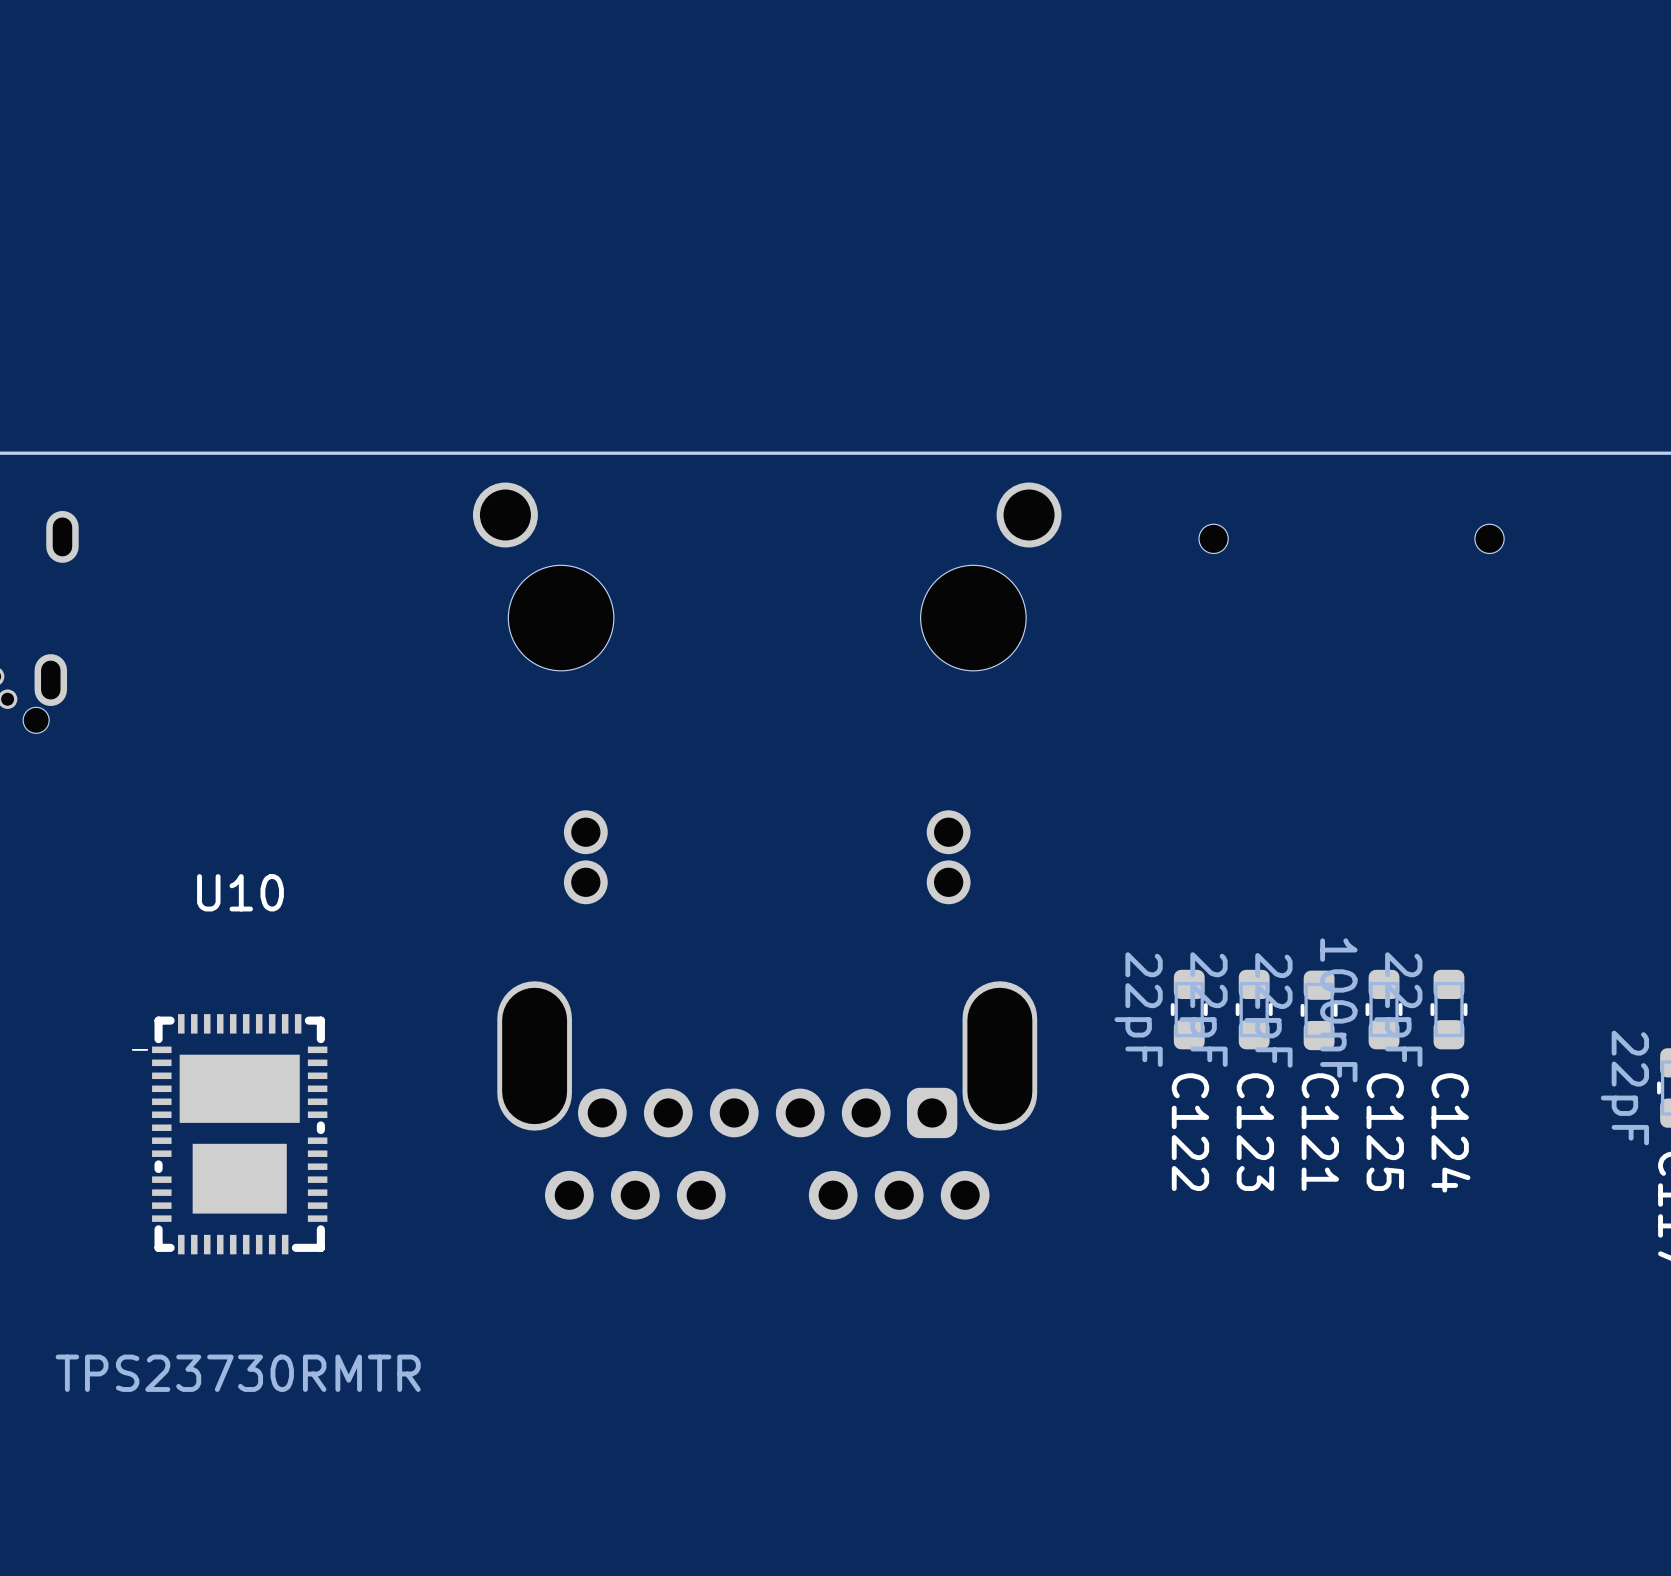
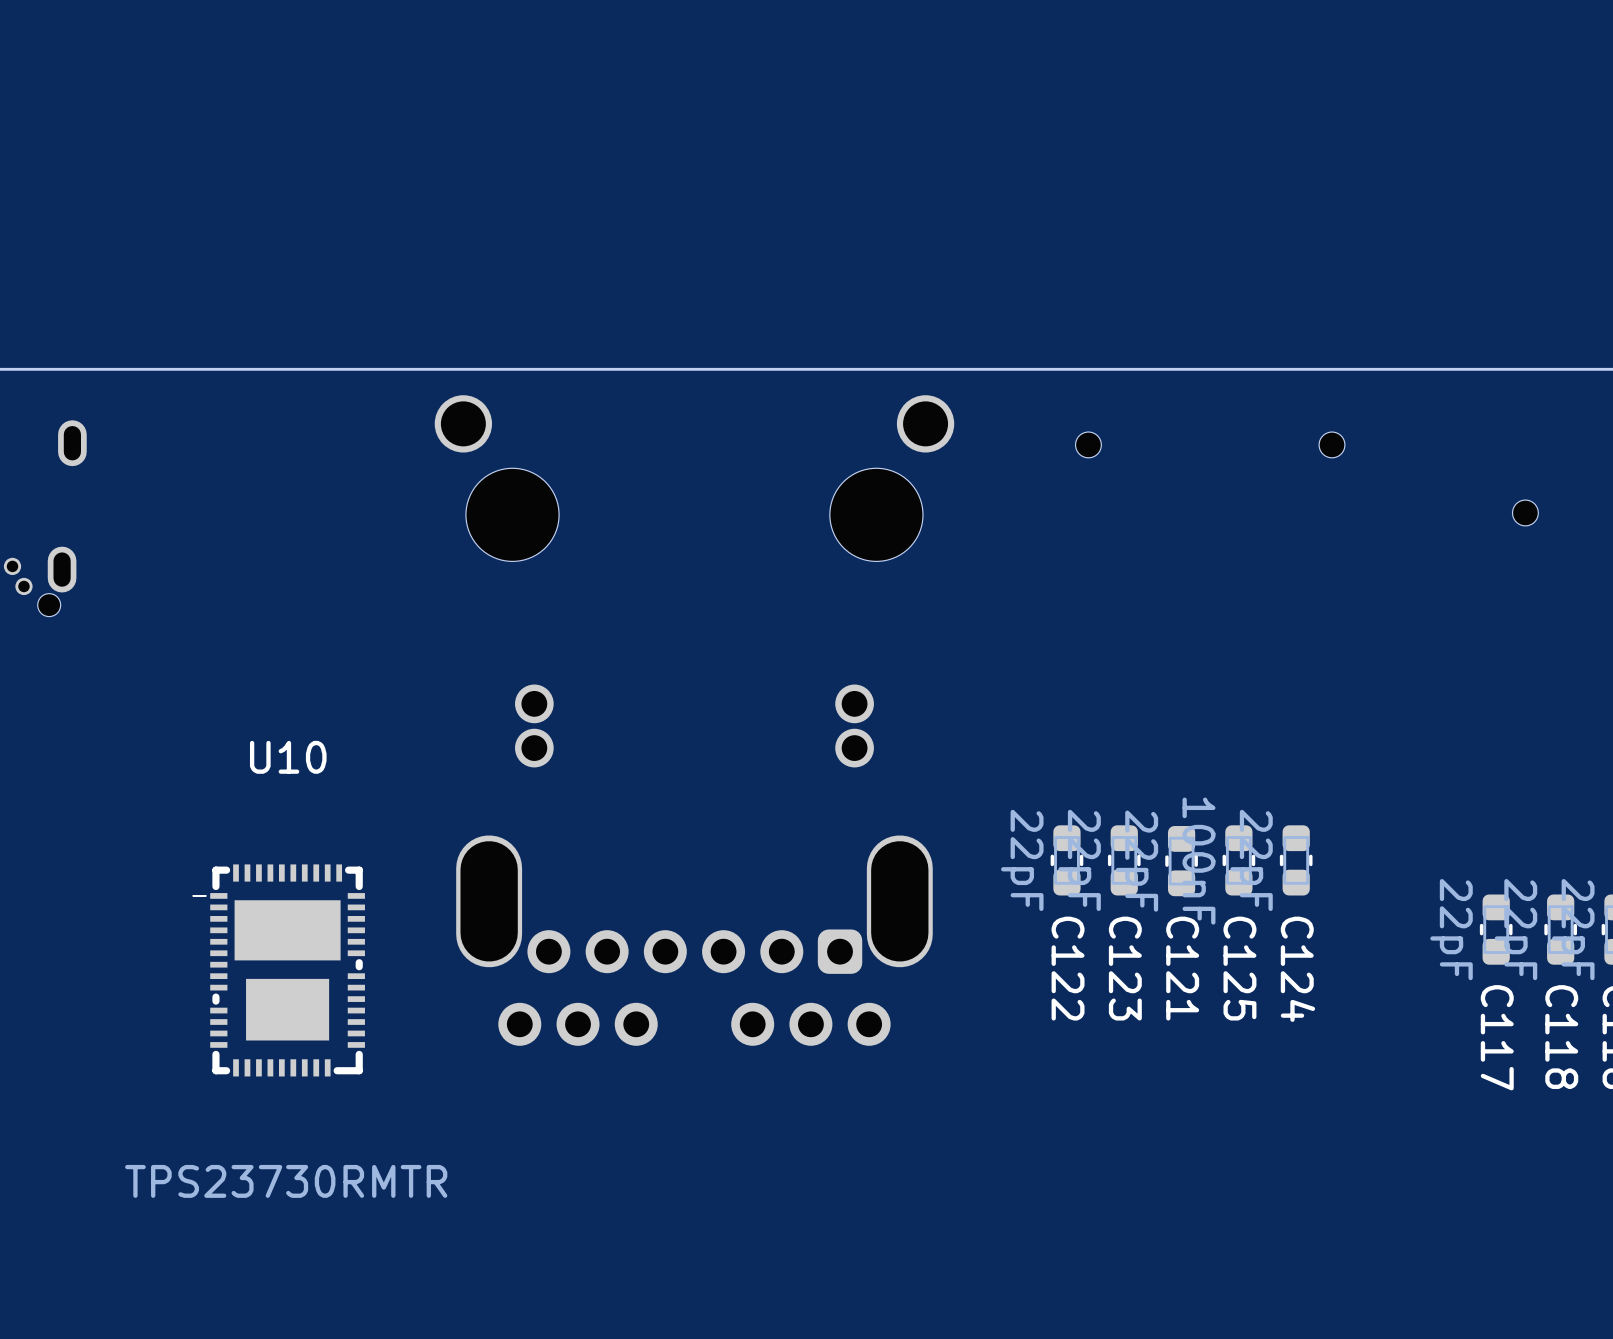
U10 position: (229, 1134) -> (278, 970)

